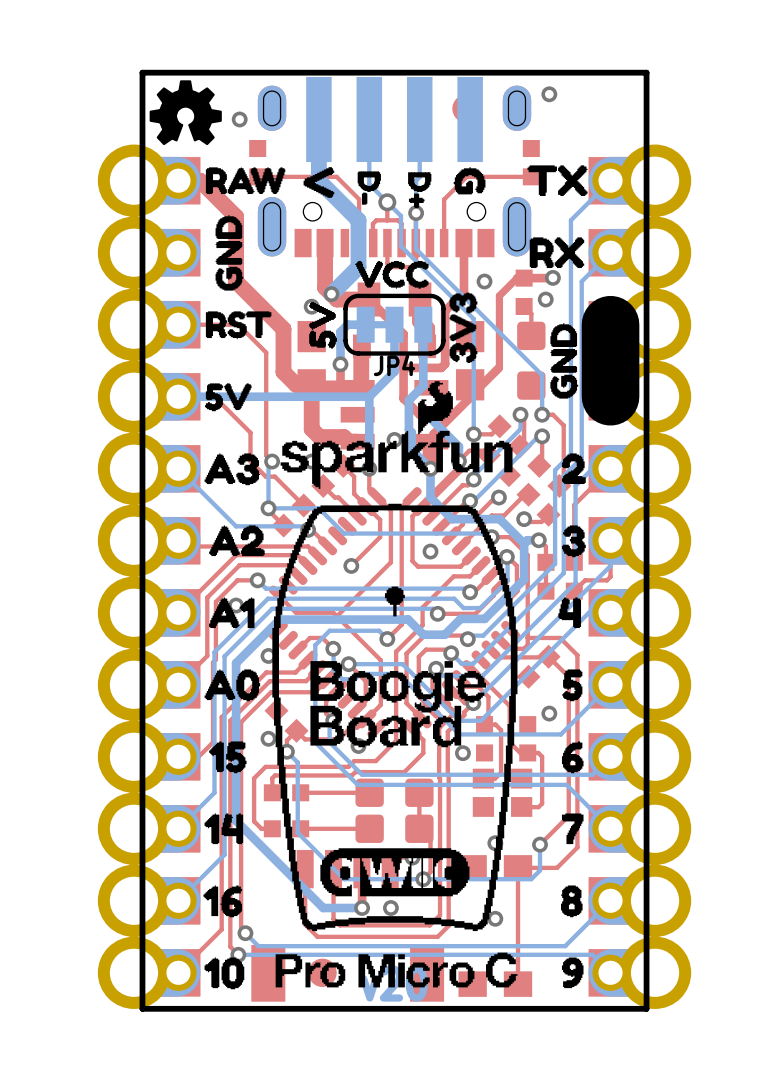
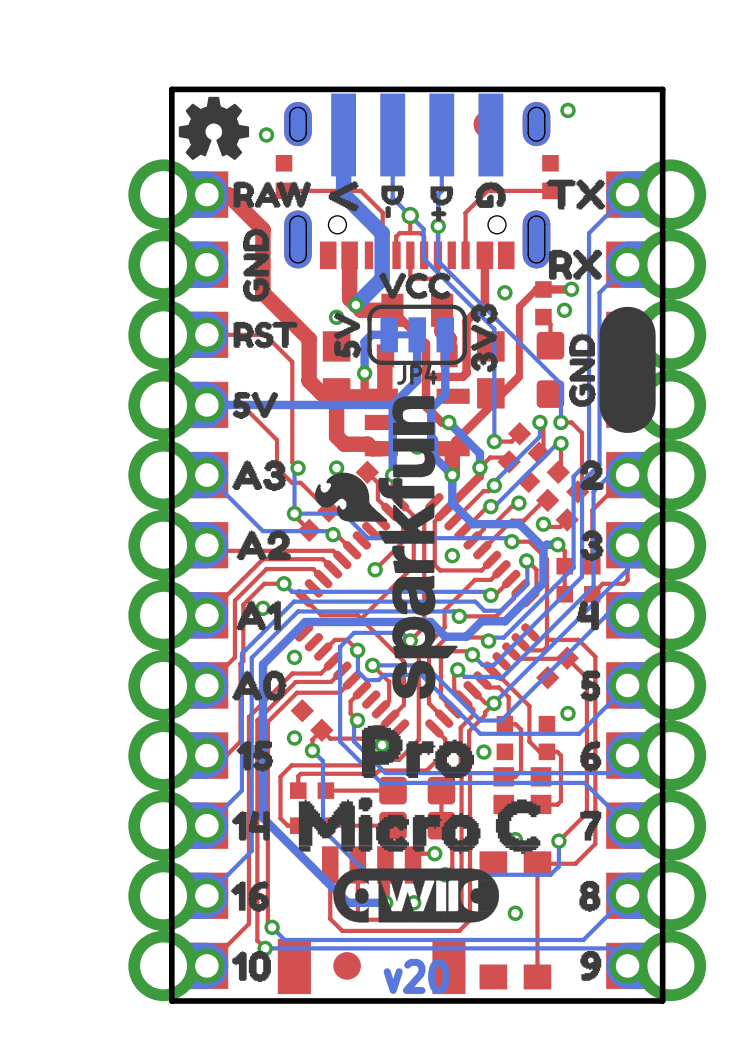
drawing: [272, 381, 518, 988] -> none
drawing: none -> [298, 396, 541, 923]
drawing: [384, 586, 405, 617] -> none

